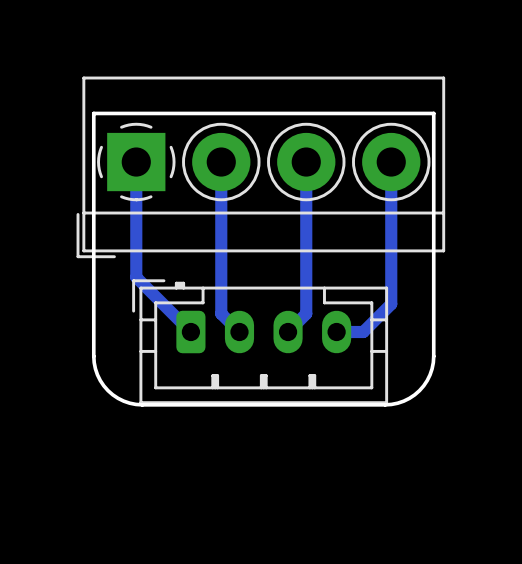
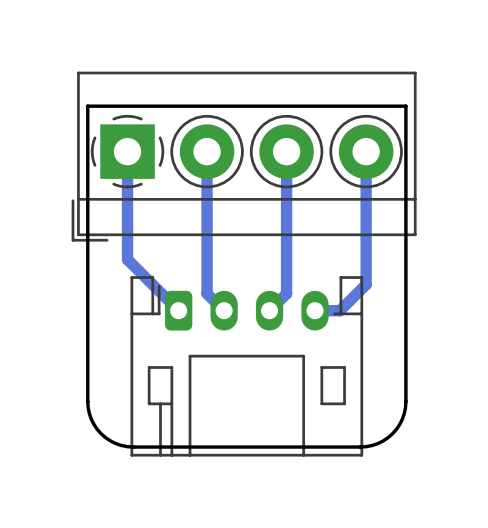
part: (260, 341) -> none
board edge: (93, 356) (97, 374) (108, 390) (123, 401) (142, 404) (391, 404) (409, 398) (419, 390) (430, 374) (433, 356) -> (87, 333) (87, 401) (91, 418) (101, 433) (110, 440) (121, 445) (133, 447) (360, 447) (377, 443) (392, 433) (399, 424) (404, 413) (405, 333)
part: none -> (246, 366)

